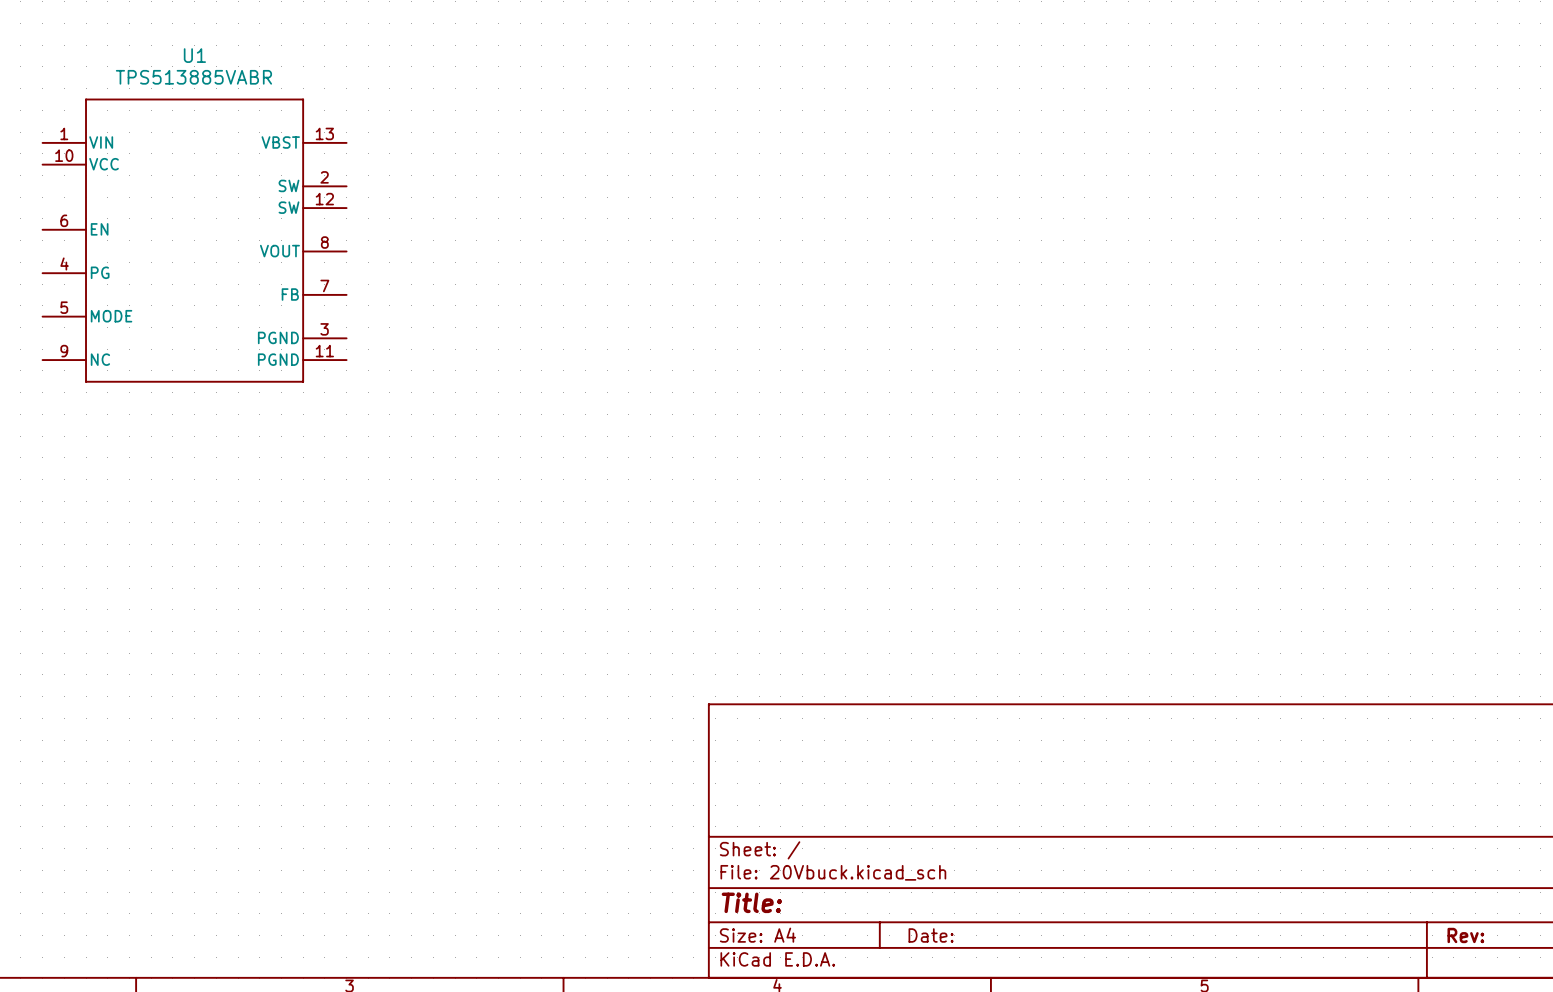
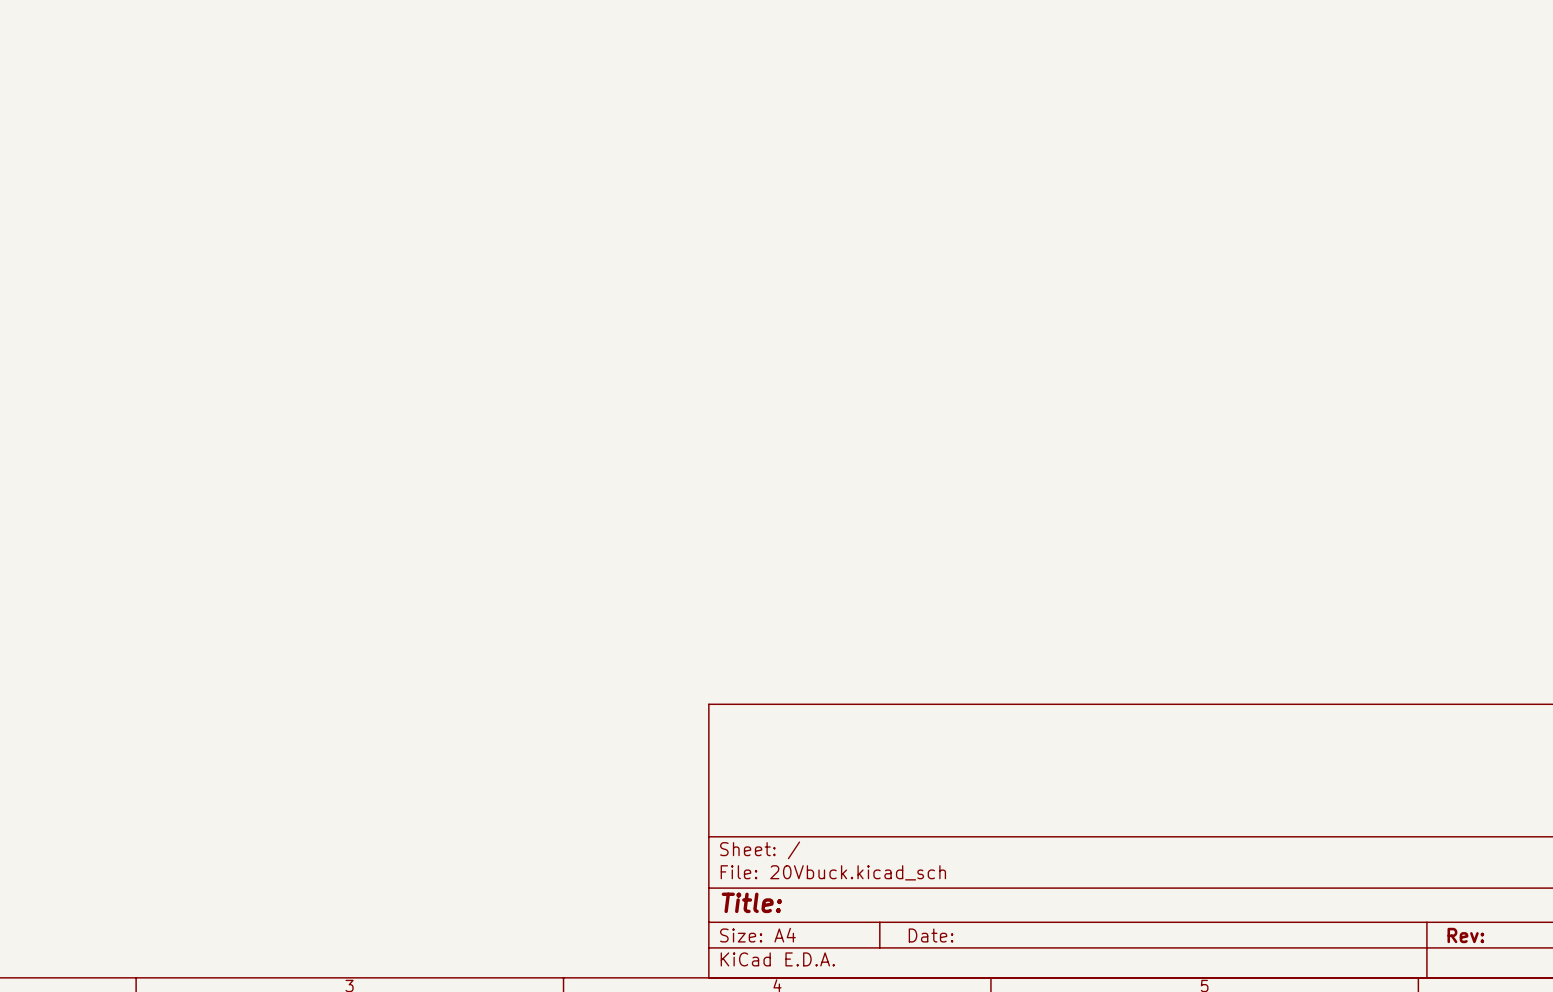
U1: TPS513885VABR (194, 240) -> none

